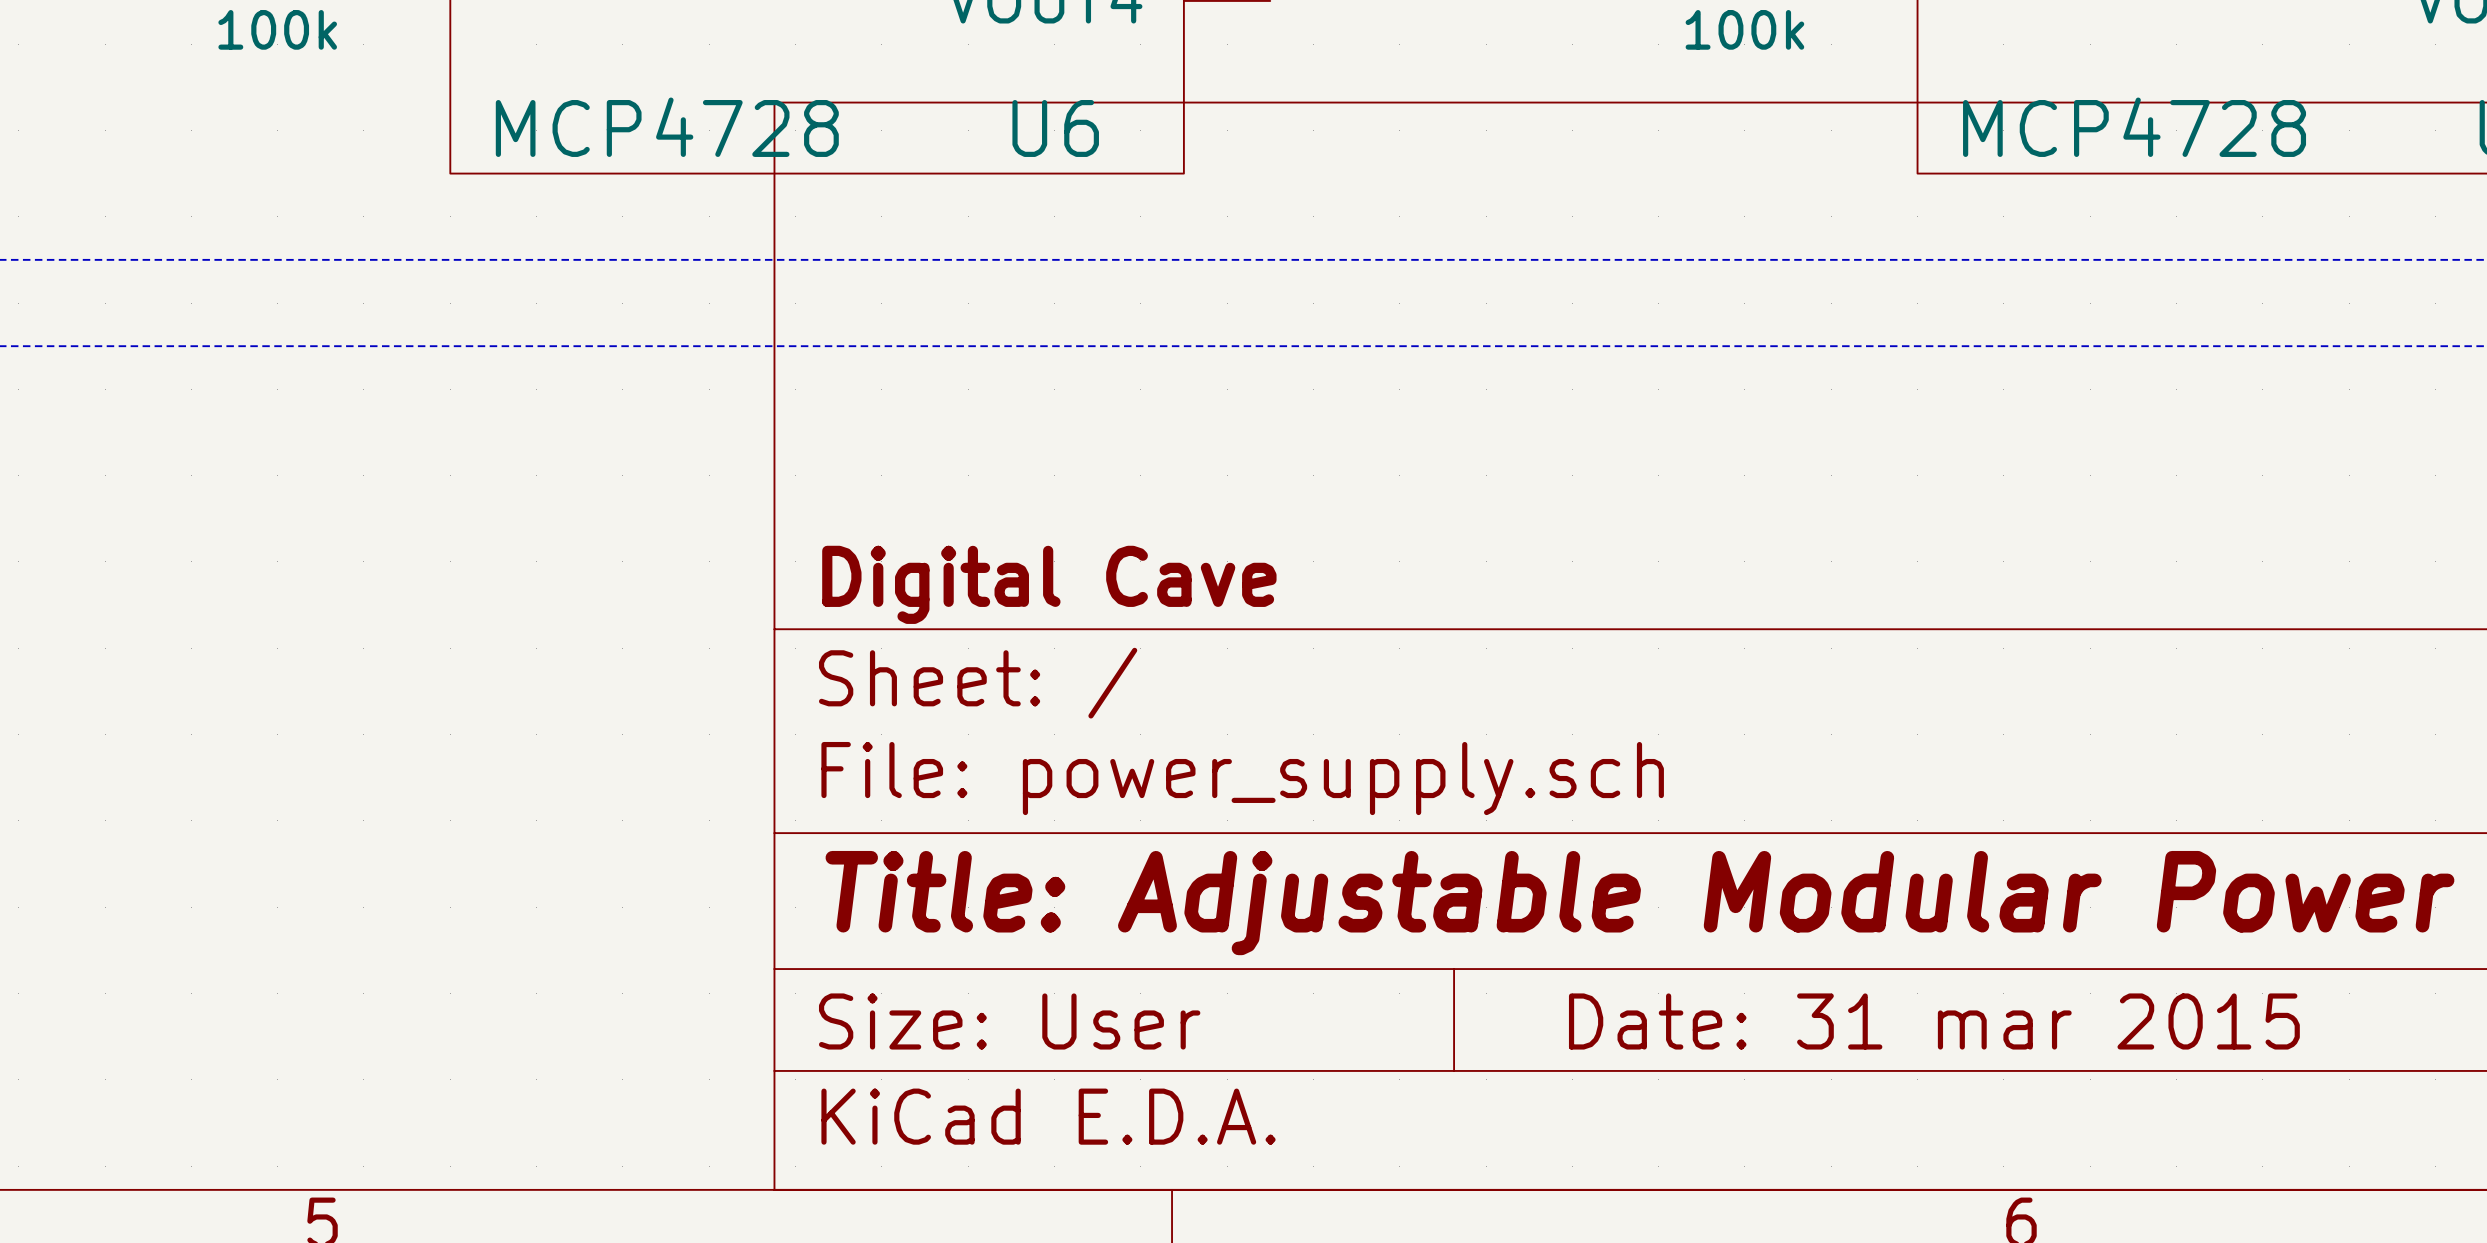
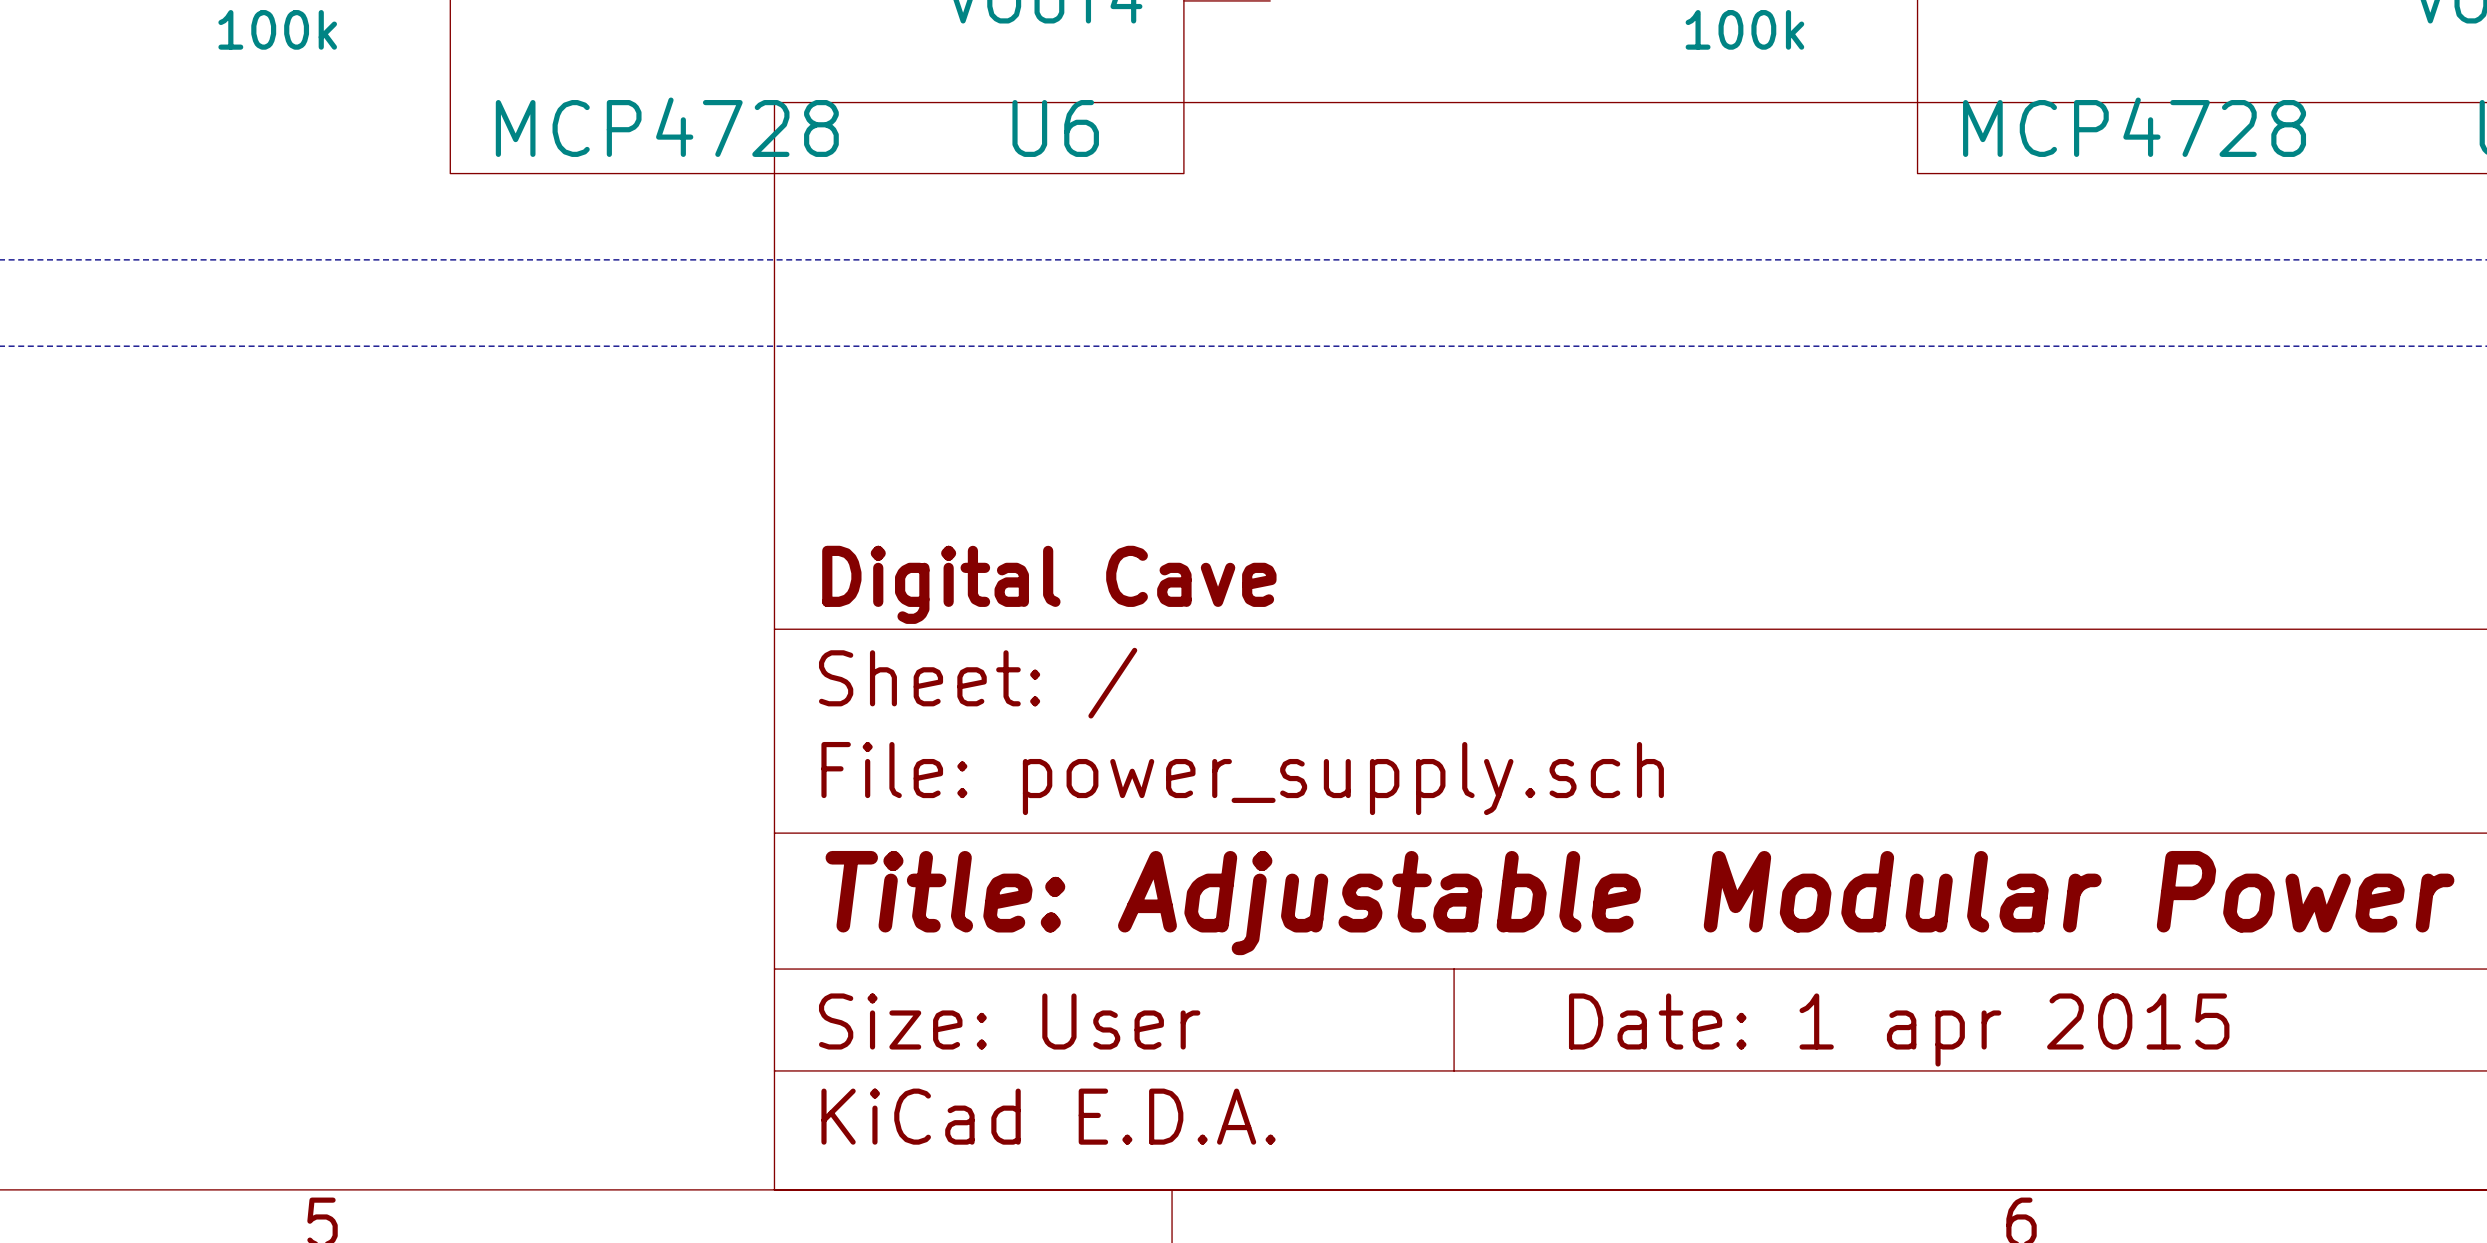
title block: Date: 31 mar 2015 (1934, 1021) -> Date: 1 apr 2015 (1899, 1029)

